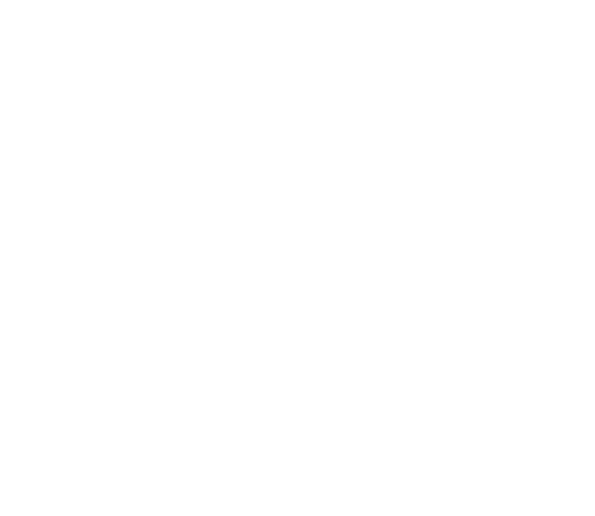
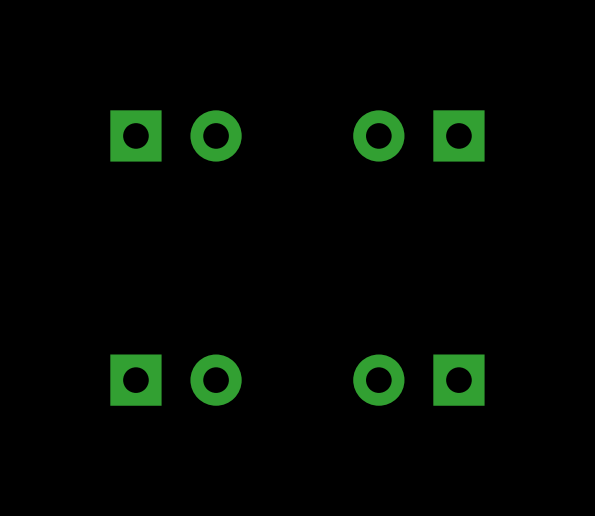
part: none -> (176, 135)
part: none -> (418, 135)
part: none -> (176, 380)
part: none -> (418, 380)

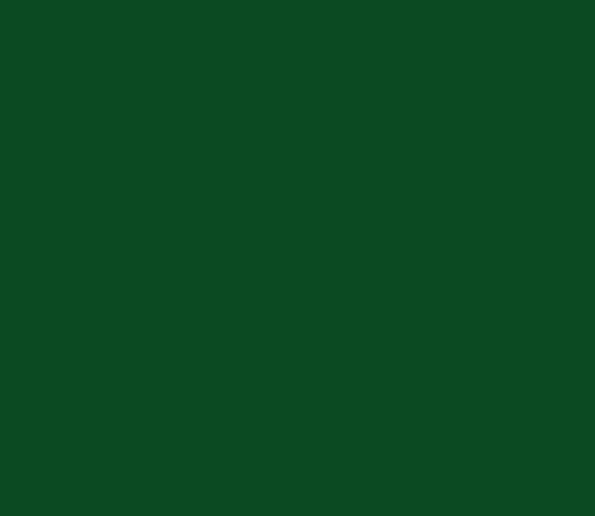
part: (176, 135) -> none
part: (418, 135) -> none
part: (176, 380) -> none
part: (418, 380) -> none

